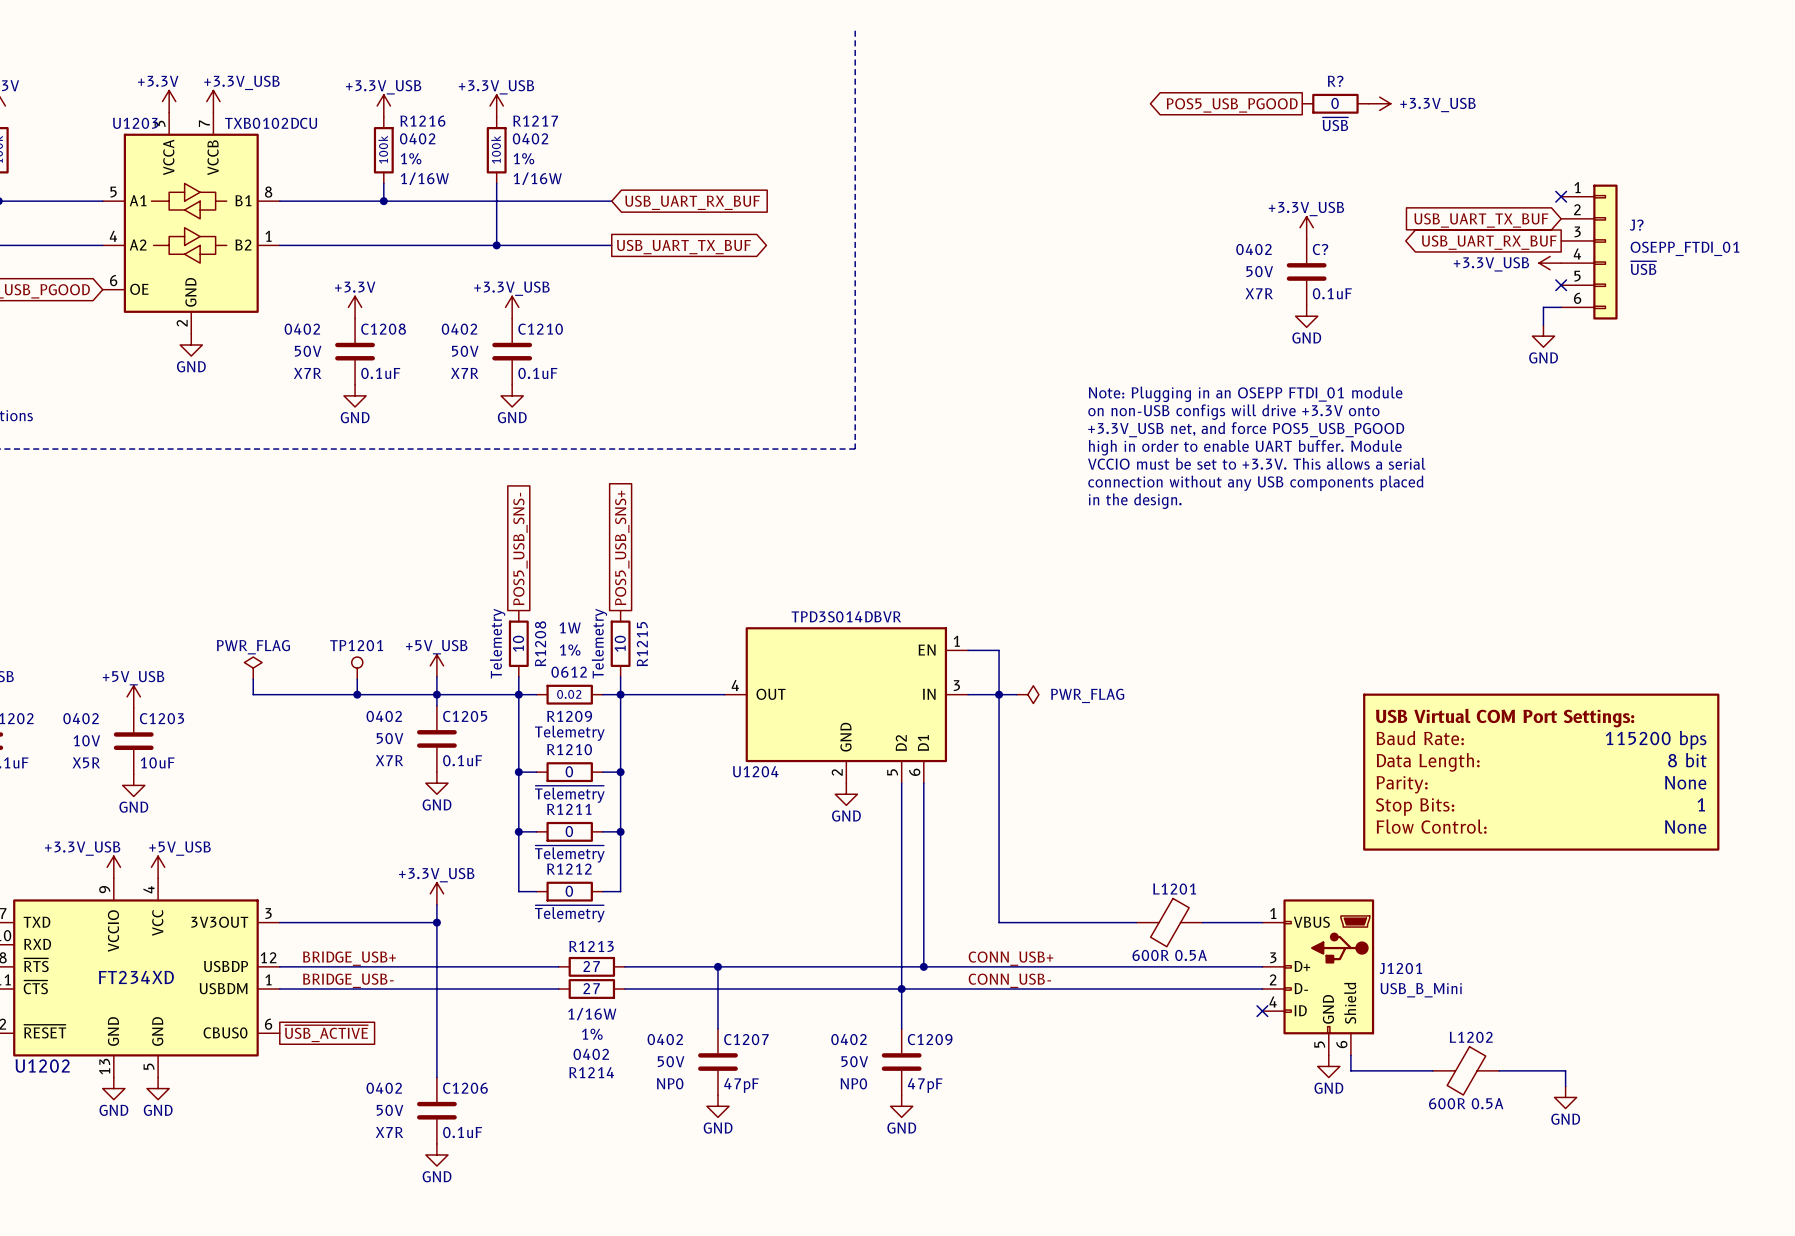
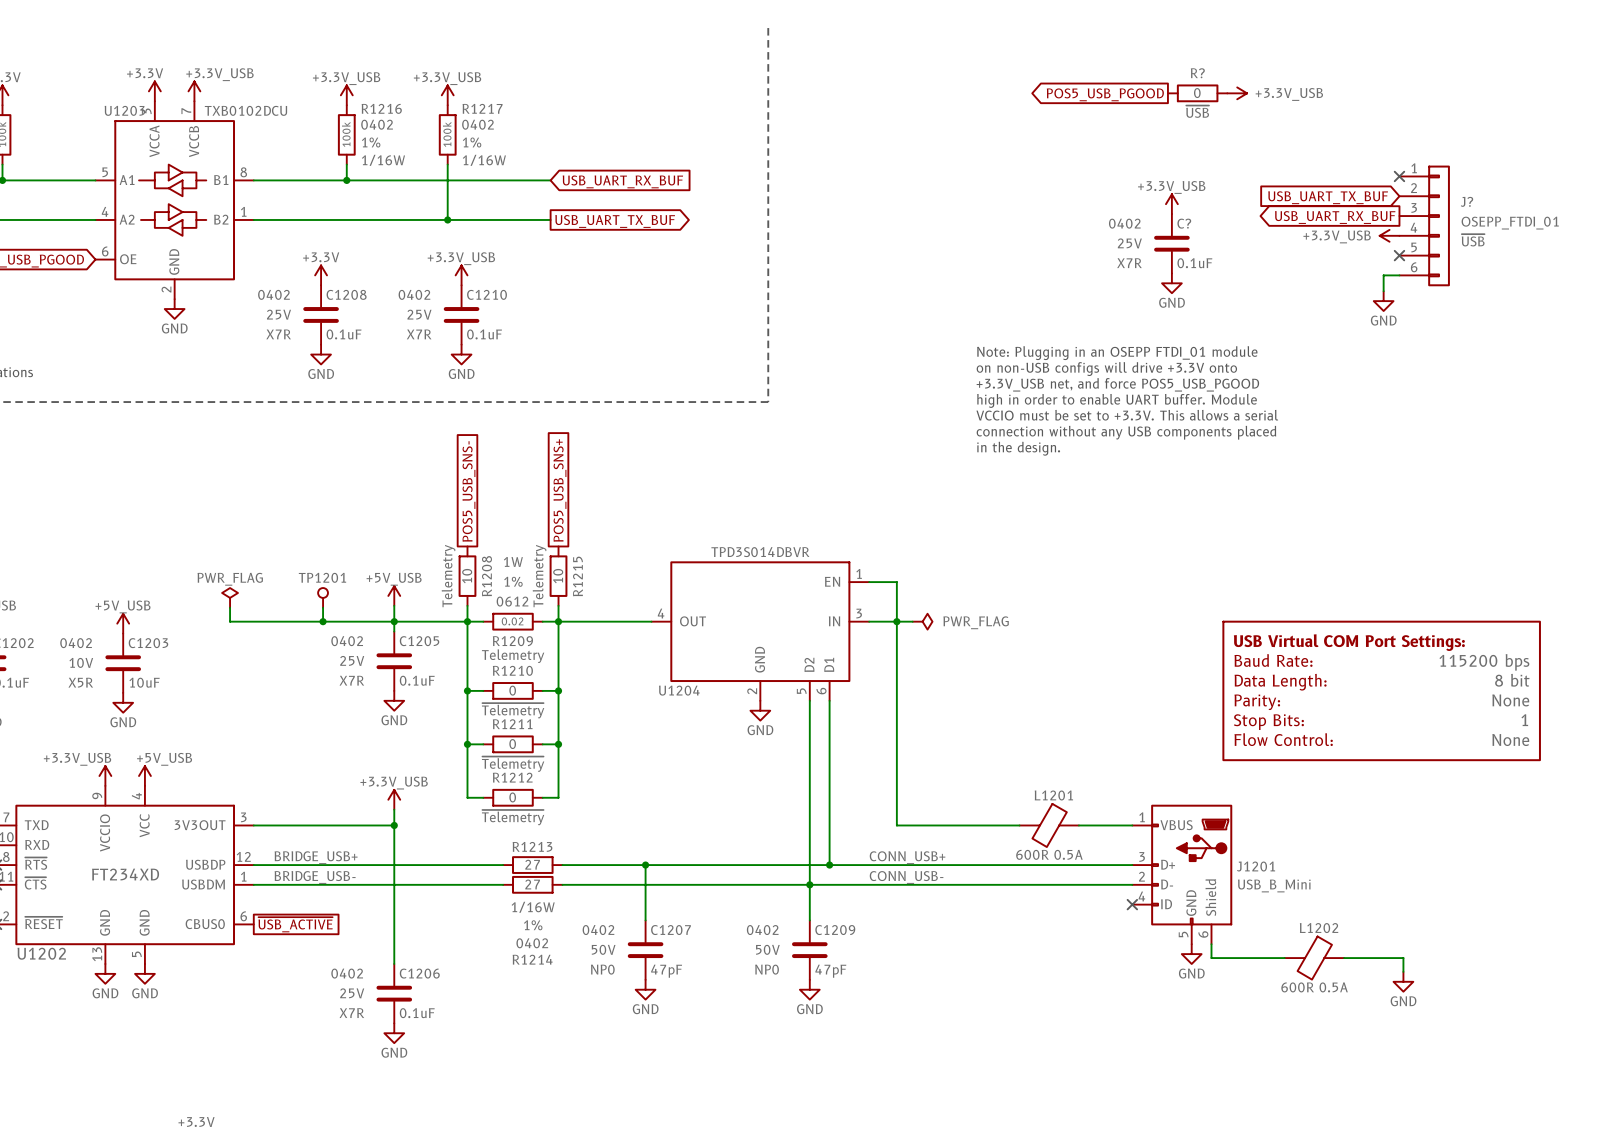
C? text: 50V (1259, 271) -> 25V (1129, 243)
C1208 text: 50V (308, 351) -> 25V (278, 314)
C1210 text: 50V (465, 351) -> 25V (419, 314)
C1205 text: 50V (390, 738) -> 25V (352, 660)
C1206 text: 50V (390, 1110) -> 25V (352, 993)

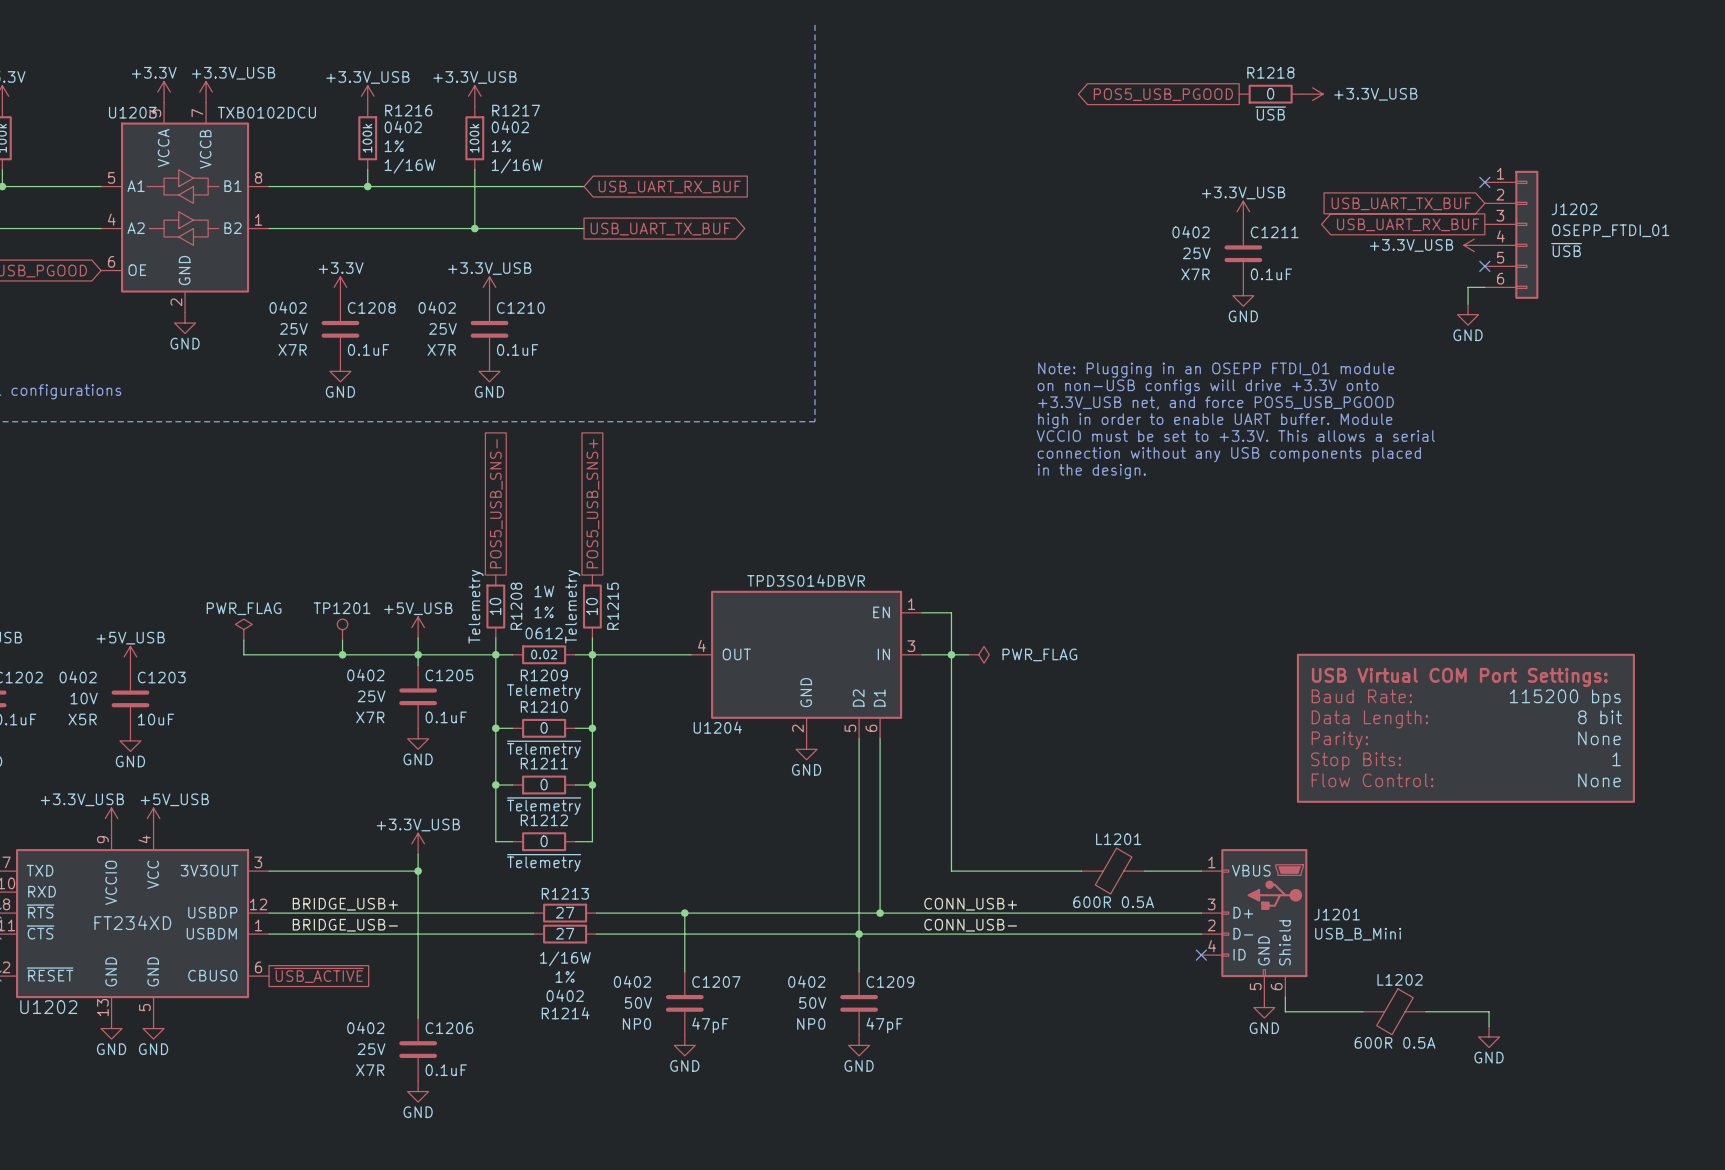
R? name: R? (1197, 73) -> R1218 (1270, 72)
J? name: J? (1466, 201) -> J1202 (1574, 209)
C? name: C? (1184, 223) -> C1211 (1274, 232)

